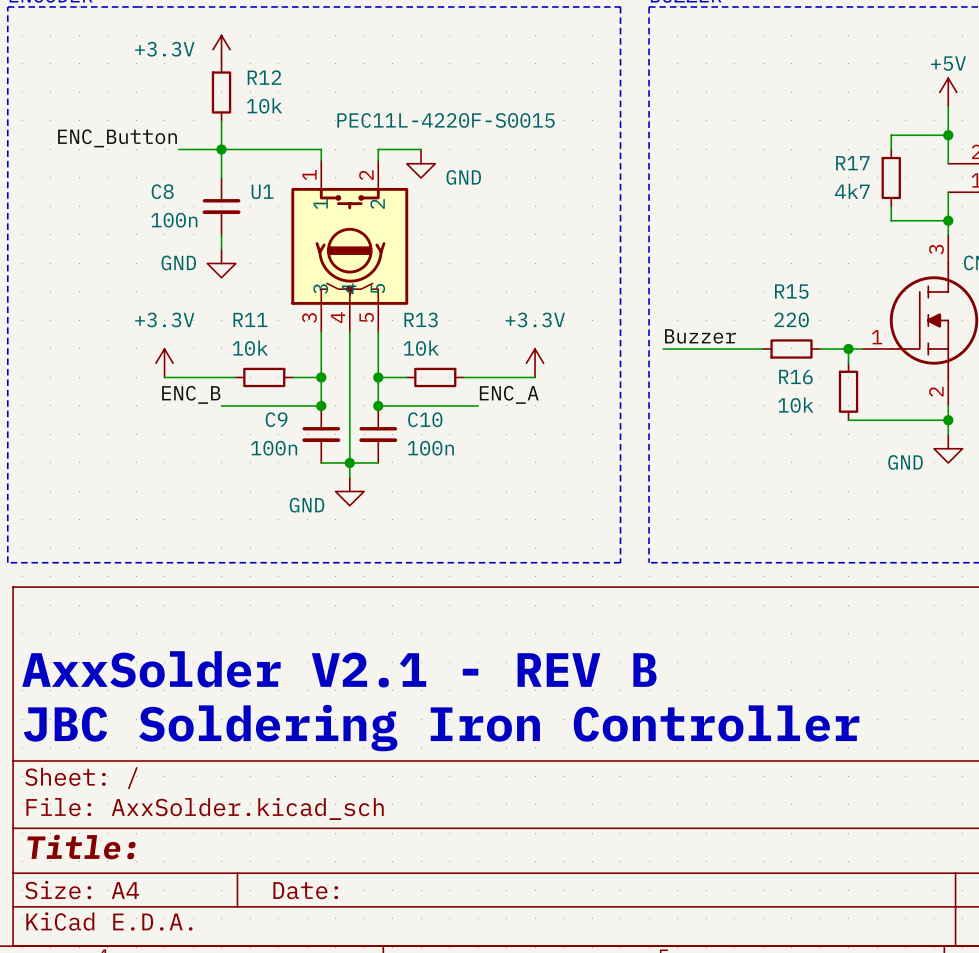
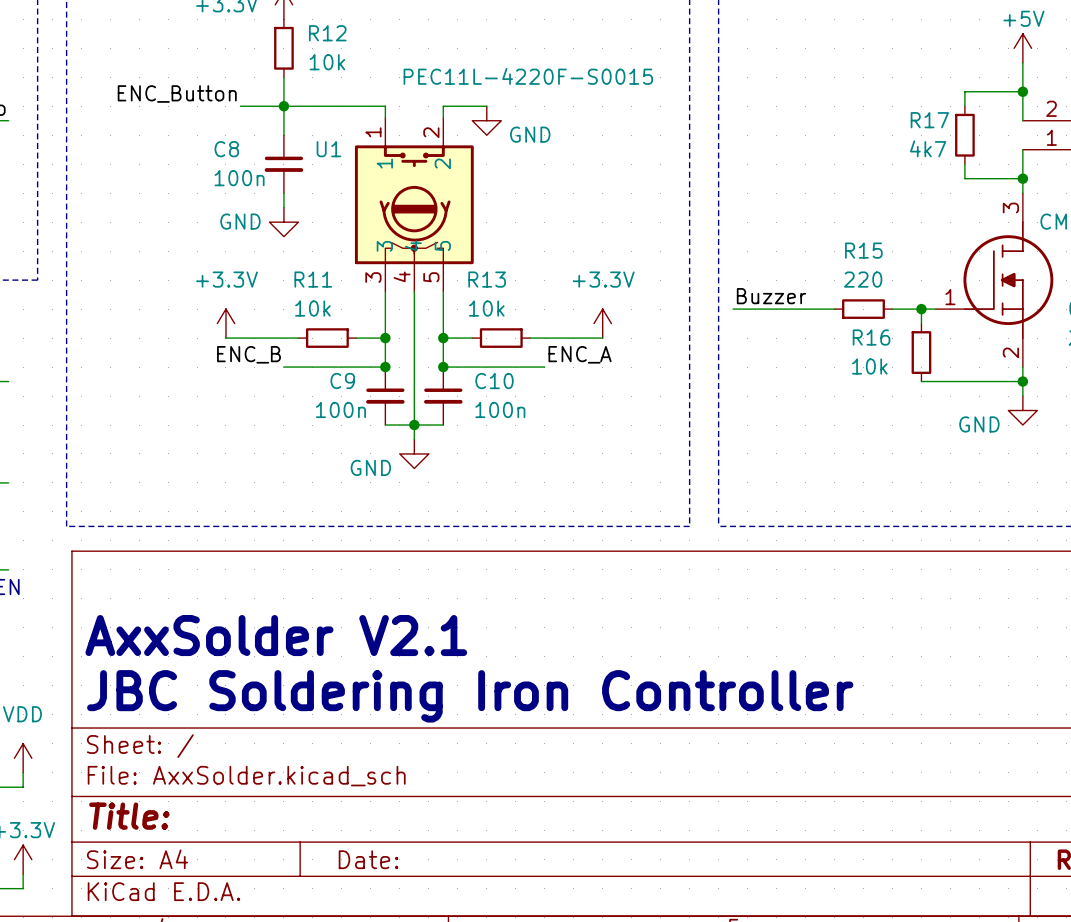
text: AxxSolder V2.1 - REV B (339, 669) -> AxxSolder V2.1 (276, 635)

